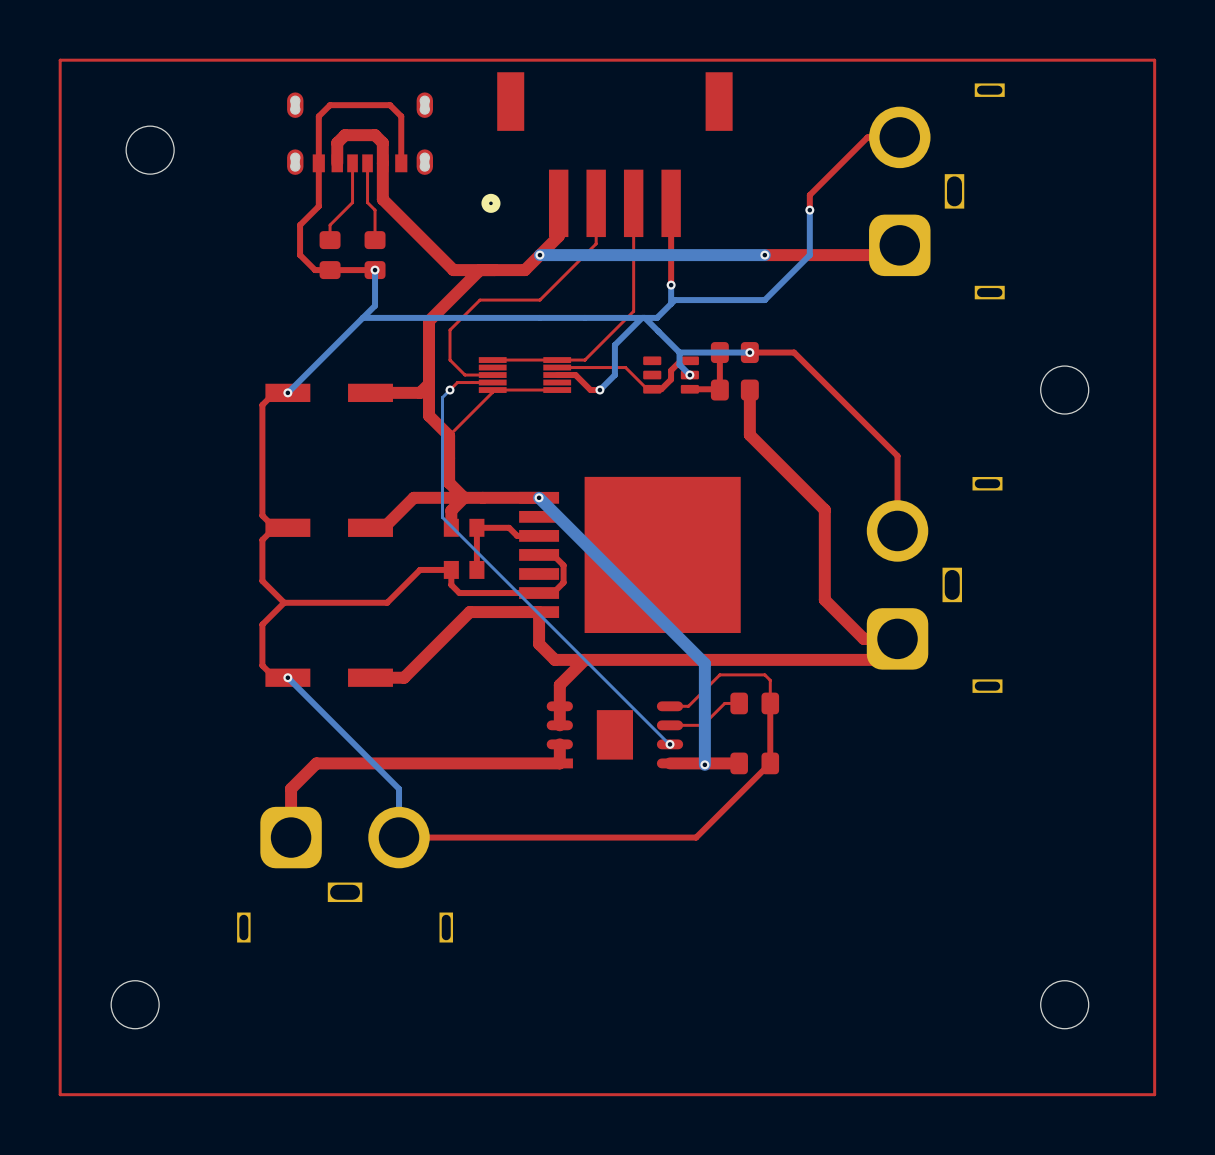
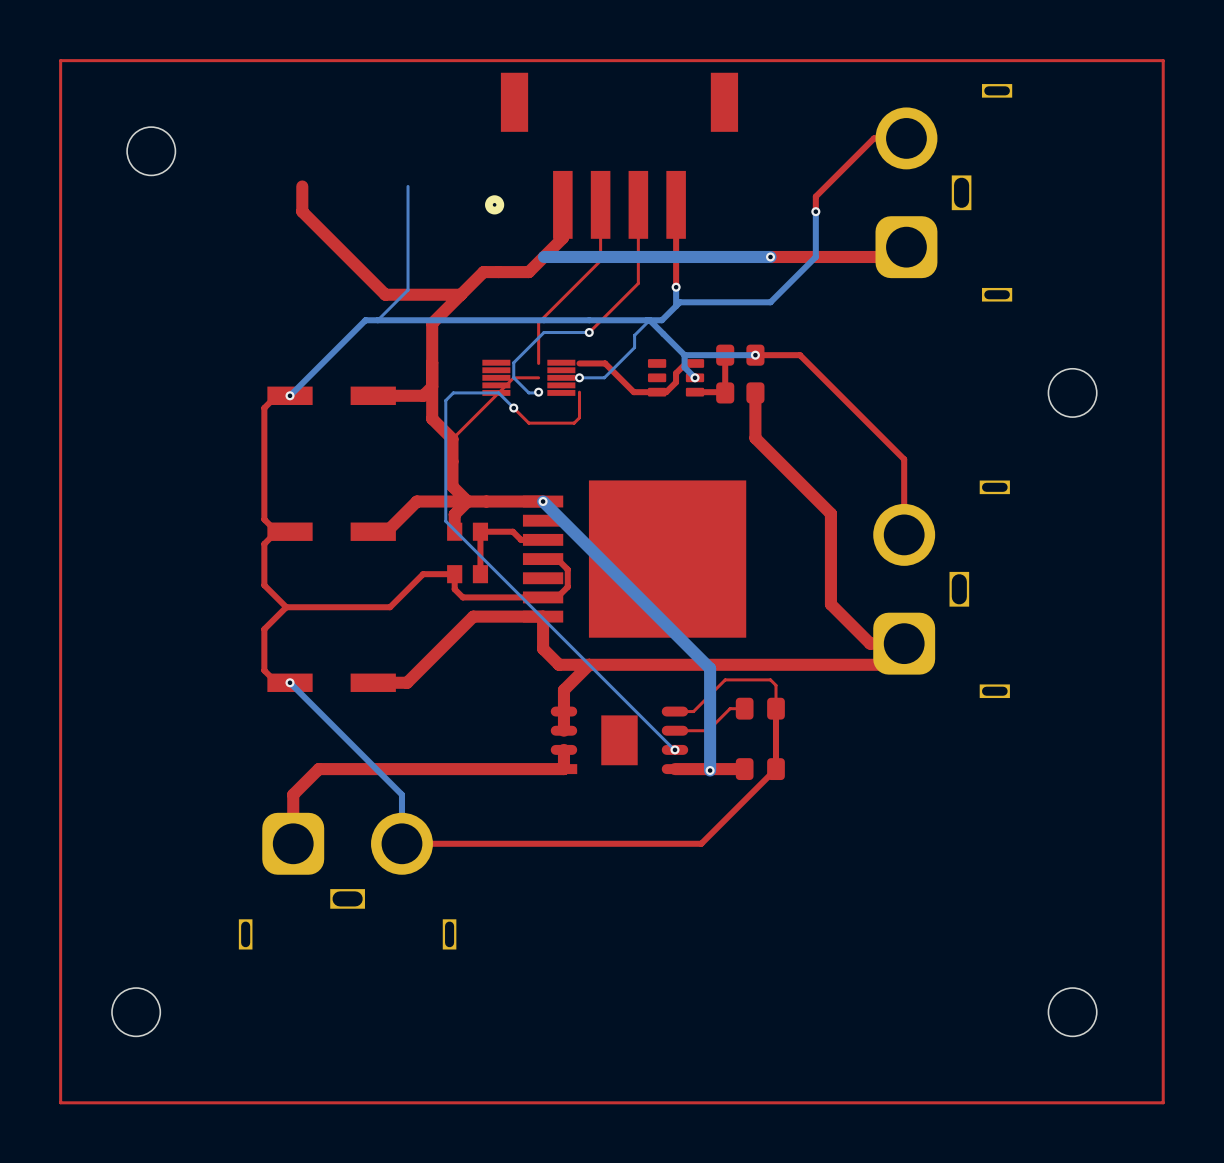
part: (360, 133) -> none
top track: (337, 163) (337, 142) (345, 135) (375, 135) (382, 142) (382, 199) (453, 270) (479, 270) -> none
top track: (352, 163) (352, 202) (330, 225) (330, 240) -> none
top track: (367, 163) (367, 202) (375, 210) (375, 240) -> none
top track: (401, 163) (401, 116) (390, 105) (330, 105) (318, 116) (318, 206) (300, 225) (300, 255) (315, 270) (375, 270) -> none
top track: none -> (302, 186) (302, 211) (385, 294) (460, 294)
bottom track: none -> (408, 186) (408, 290) (377, 320)
top track: (596, 243) (539, 300) (479, 300) (450, 330) (450, 360) (464, 375) (492, 375) -> (600, 245) (600, 260) (538, 322) (538, 363)
part: (330, 255) -> none
part: (375, 255) -> none
via: (539, 255) -> none
bottom track: (375, 270) (375, 305) (362, 317) -> none
via: (375, 270) -> none
top track: (633, 281) (633, 311) (584, 360) (492, 360) -> (638, 283) (589, 332)
bottom track: (642, 317) (614, 345) (614, 375) (599, 390) -> none
bottom track: none -> (649, 320) (634, 335) (634, 347) (604, 377) (579, 377)
bottom track: none -> (589, 332) (543, 332) (513, 362) (513, 377) (528, 392) (538, 392)
via: none -> (589, 332)
top track: (557, 367) (625, 367) (647, 389) -> (579, 363) (605, 363) (633, 392) (652, 392)
top track: (557, 375) (575, 375) (590, 390) (599, 390) -> none
top track: (492, 382) (457, 382) (450, 390) -> none
via: none -> (538, 392)
top track: none -> (579, 392) (579, 417) (574, 423) (528, 423) (513, 408)
bottom track: none -> (453, 392) (498, 392) (513, 408)
via: (450, 390) -> none
top track: (557, 390) (492, 390) (492, 392) -> (538, 377) (513, 377) (496, 395)
via position: (599, 390) -> (579, 377)
via: none -> (513, 408)

